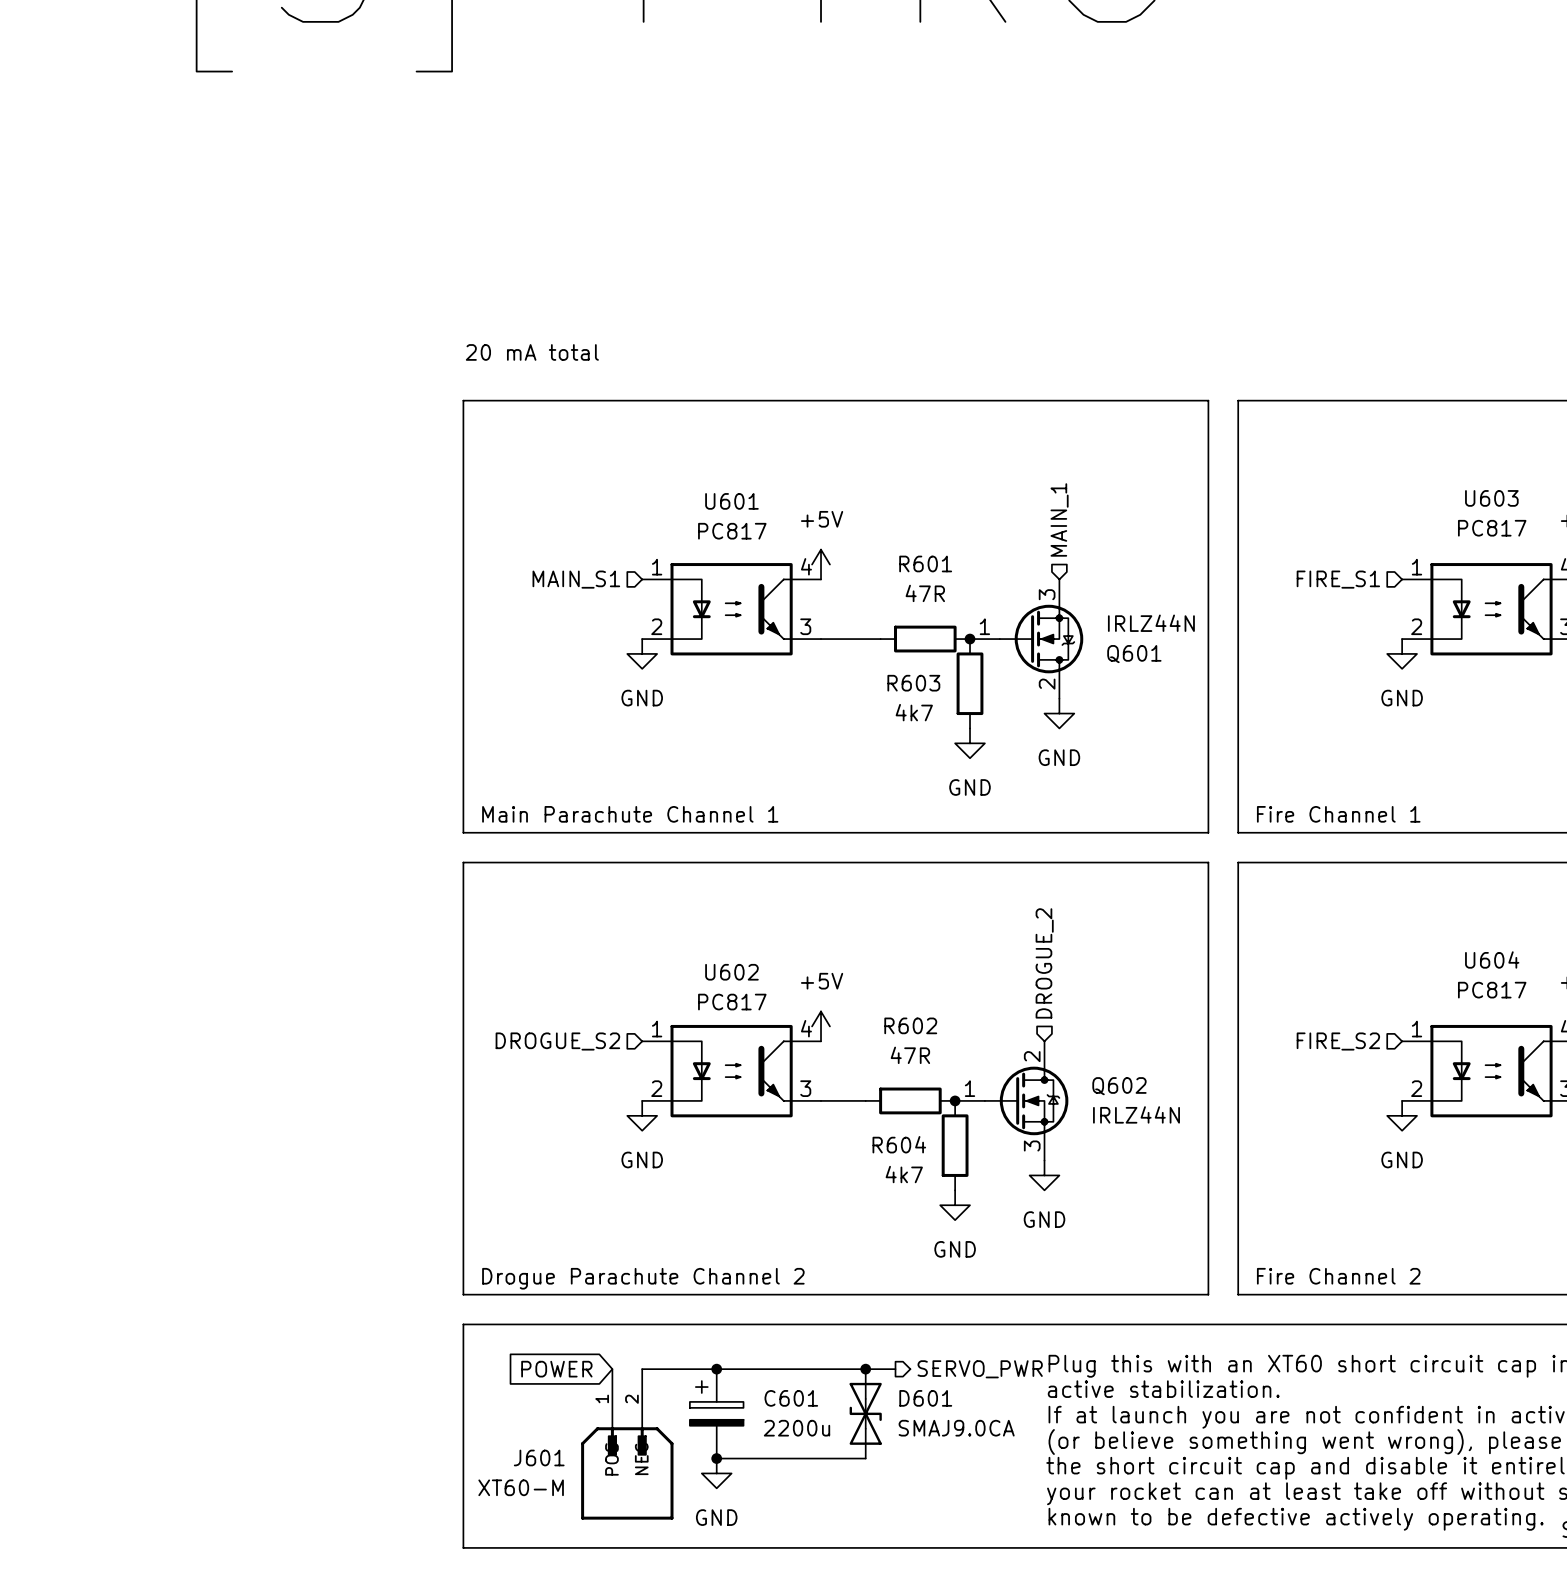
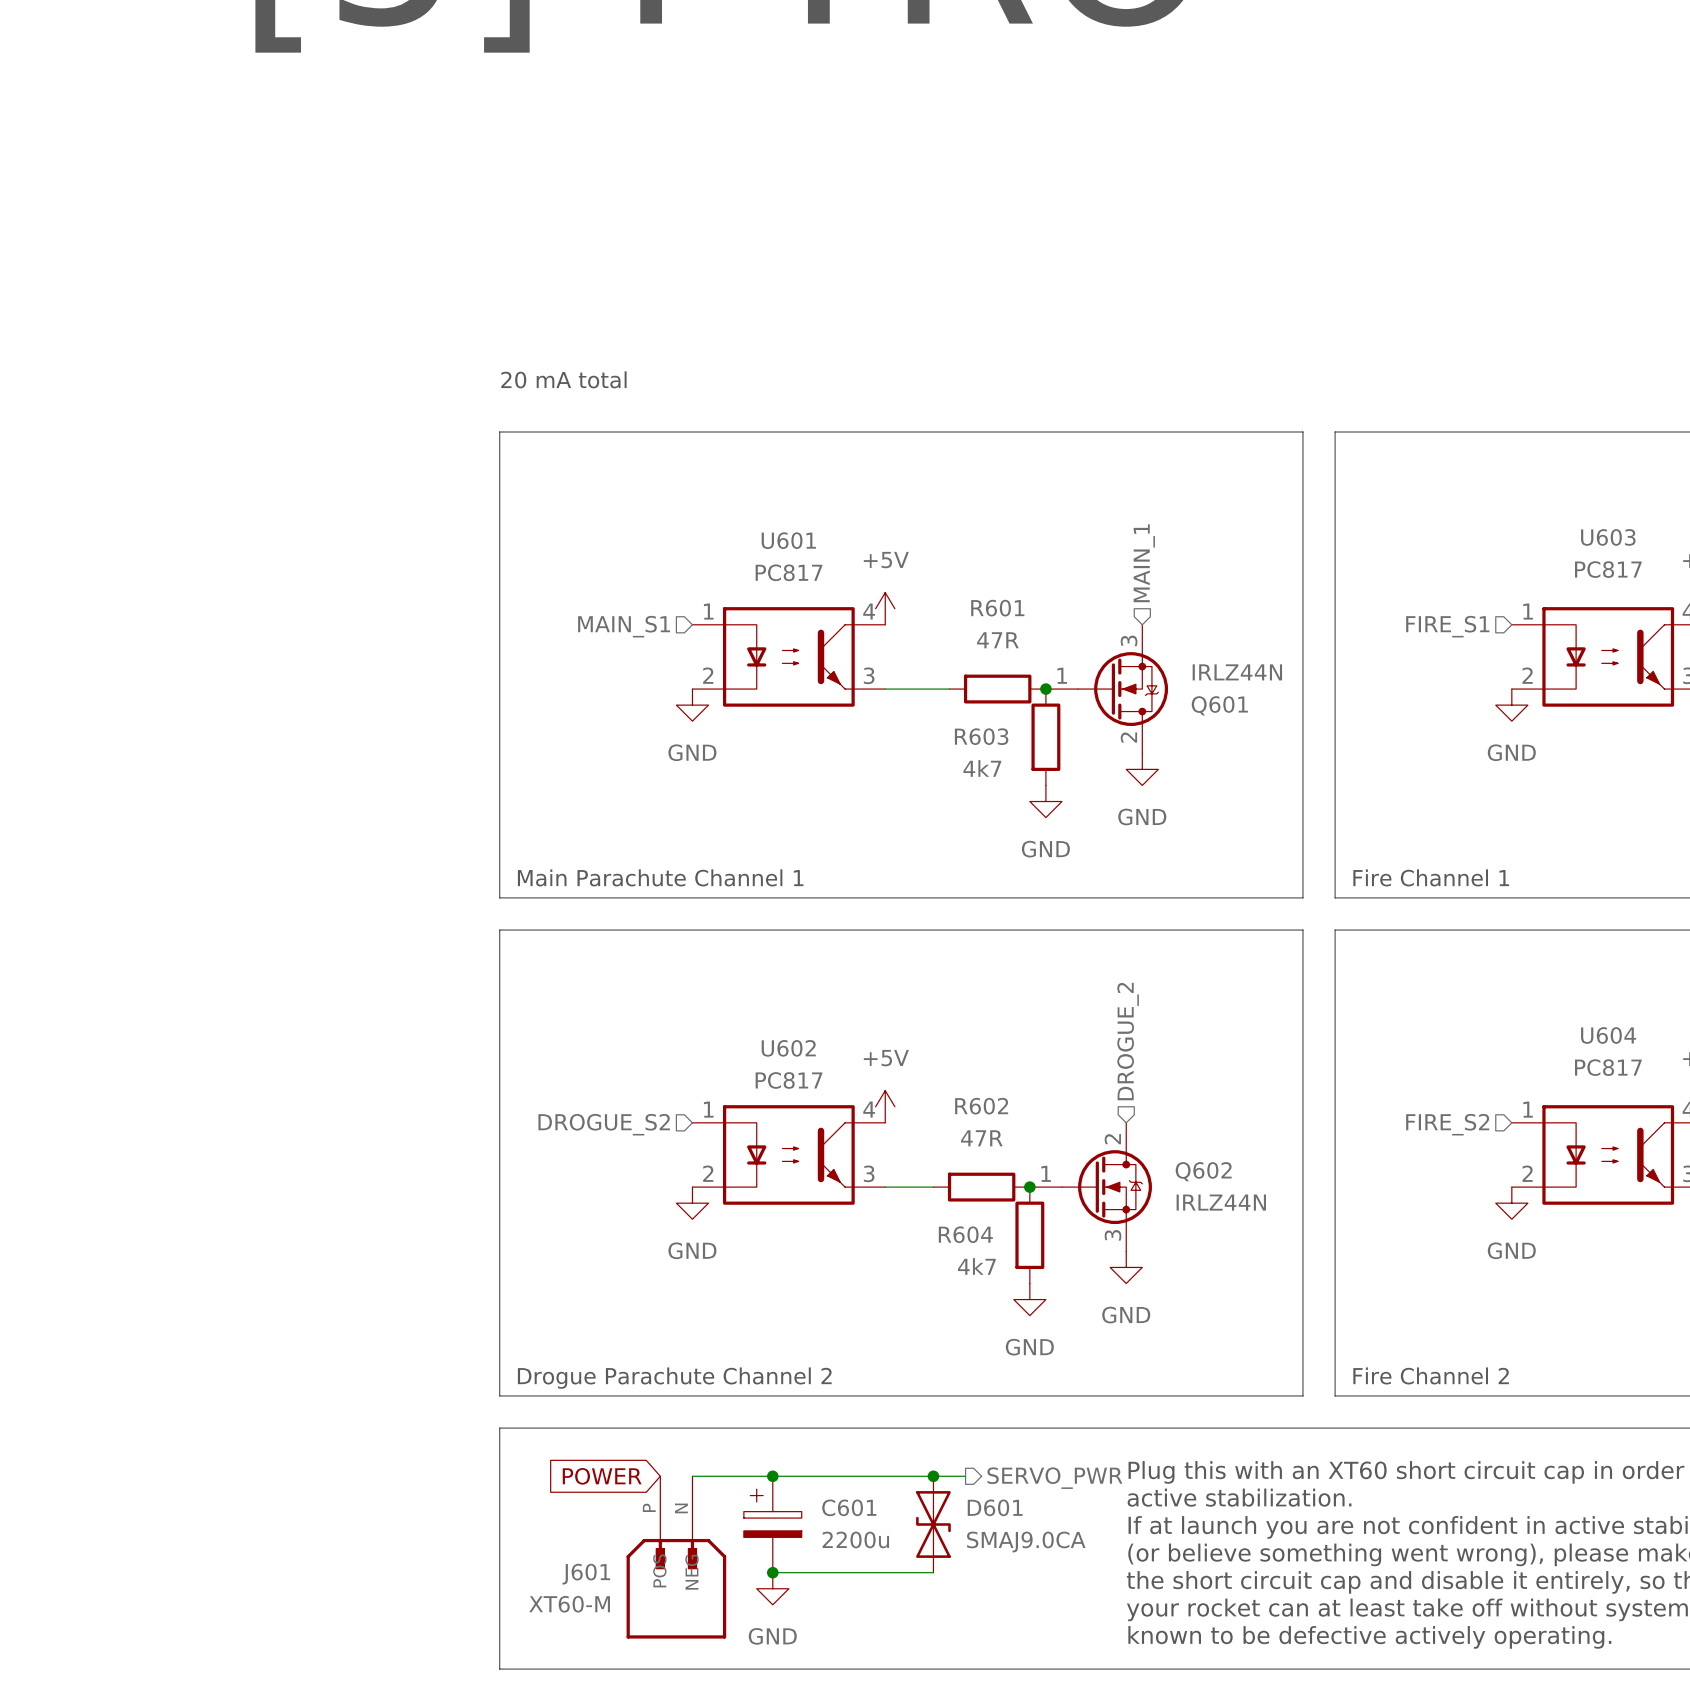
J601 pin number: 1 (602, 1398) -> P (649, 1507)
J601 pin number: 2 (631, 1399) -> N (681, 1508)

